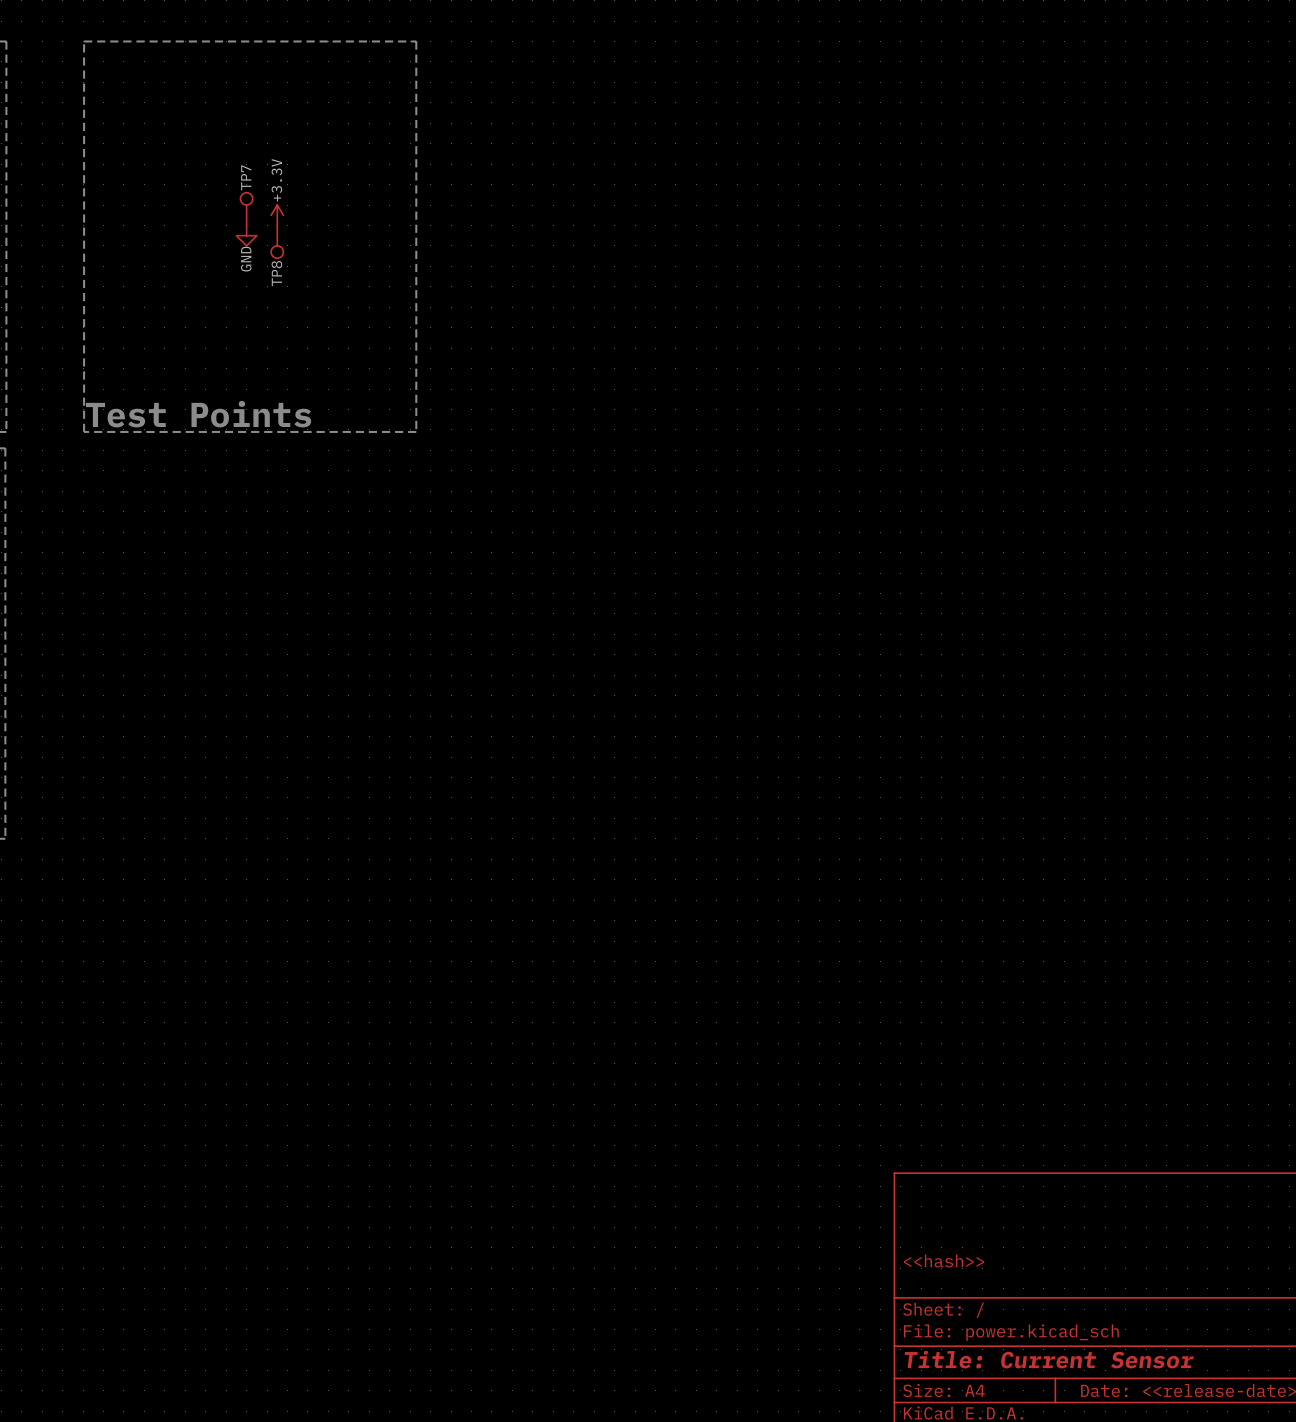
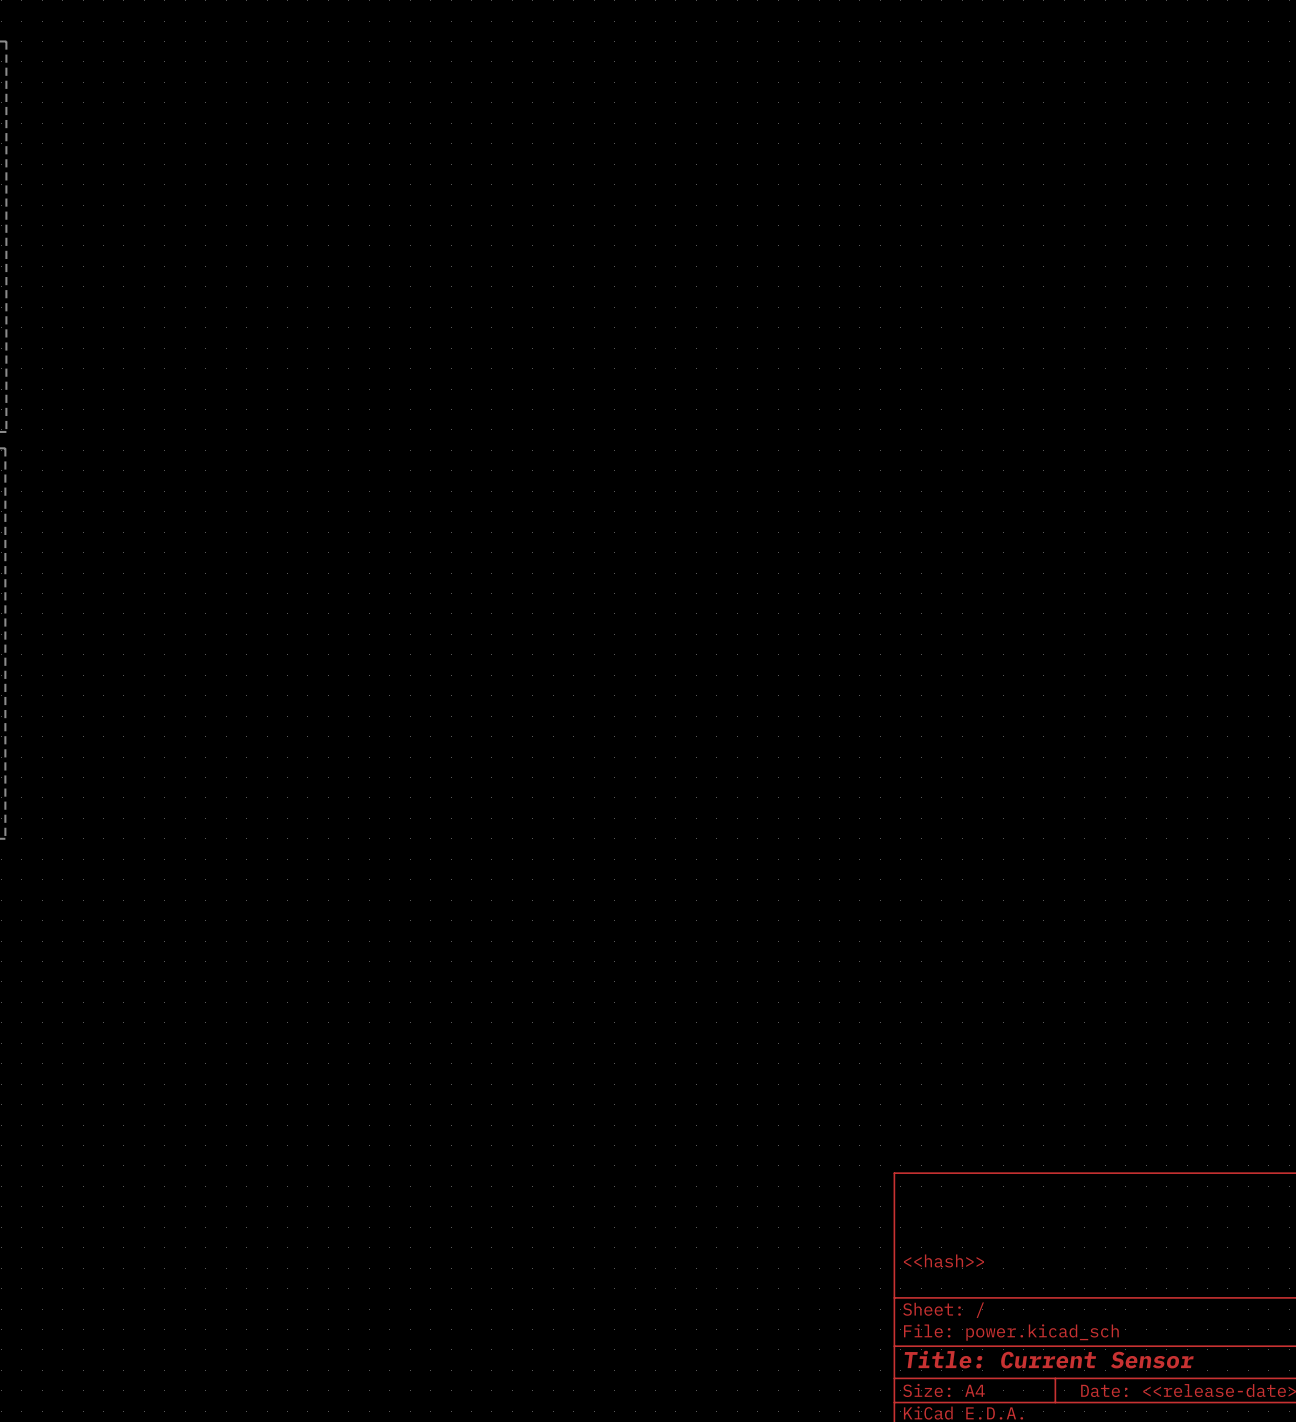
line: (84, 41) (416, 41) (416, 431) (84, 431) (84, 41) -> none
TP7: (246, 209) -> none
power symbol: +3.3V (277, 215) -> none
power symbol: GND (246, 235) -> none
TP8: (277, 241) -> none
text: Test Points (198, 414) -> none

